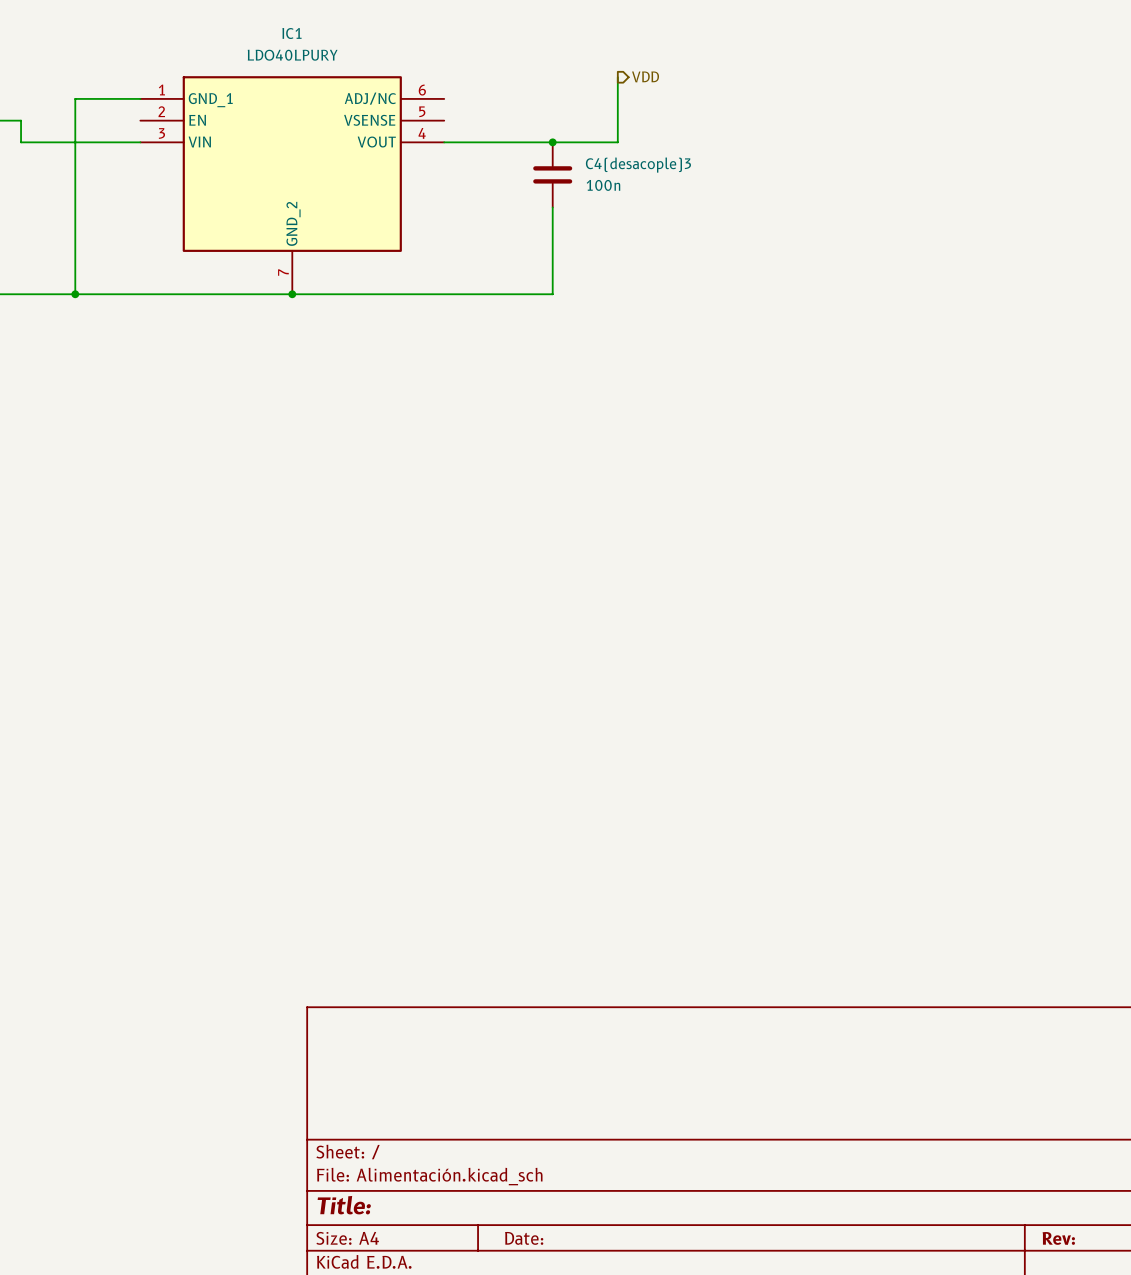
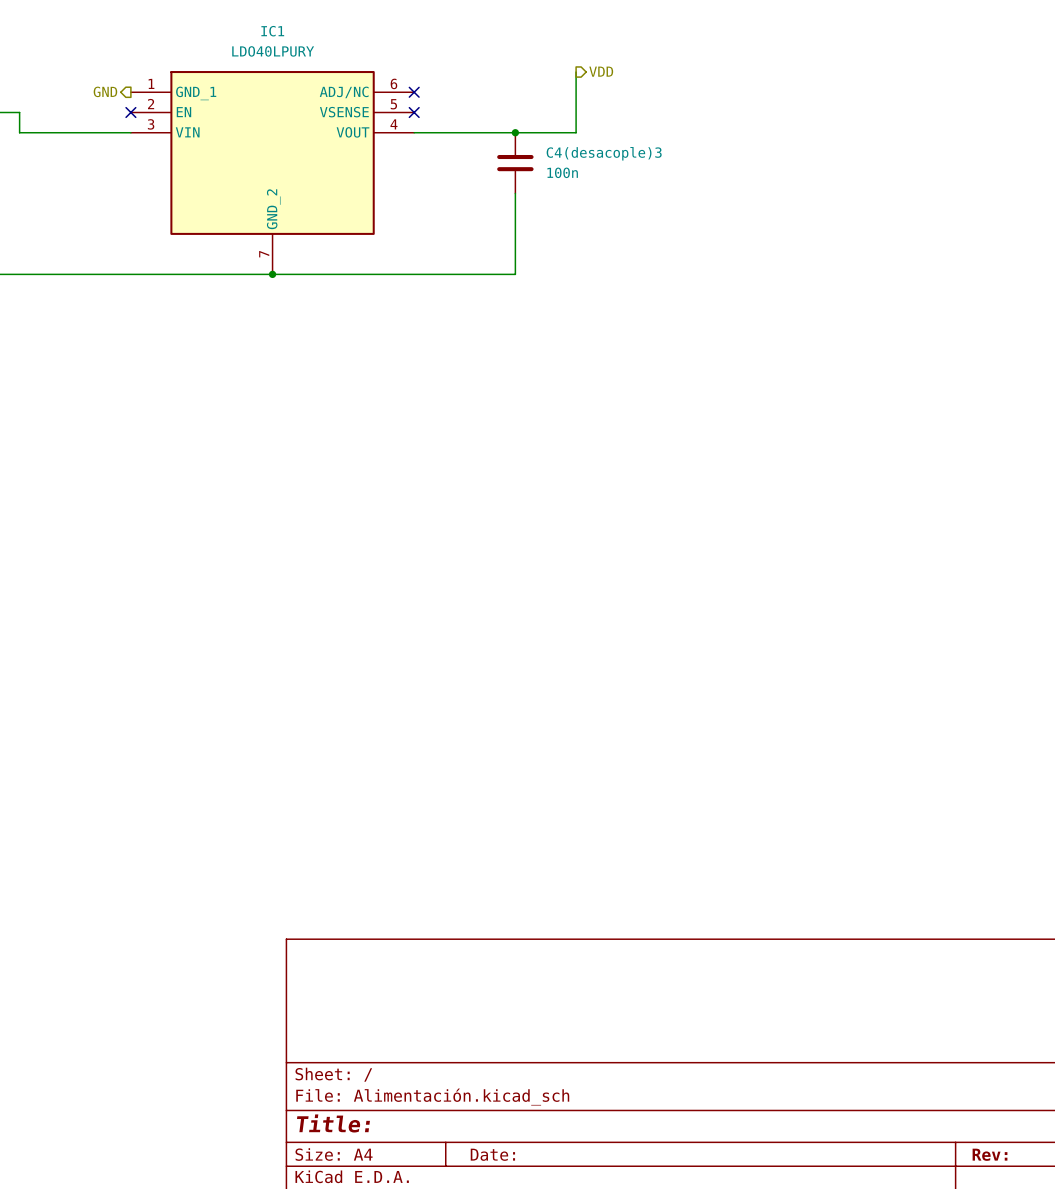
hierarchical label: none -> GND (105, 91)
wire: (140, 98) (75, 98) (75, 294) -> none
no-connect mark: none -> (414, 92)
no-connect mark: none -> (130, 112)
no-connect mark: none -> (414, 112)
junction: (75, 294) -> none

